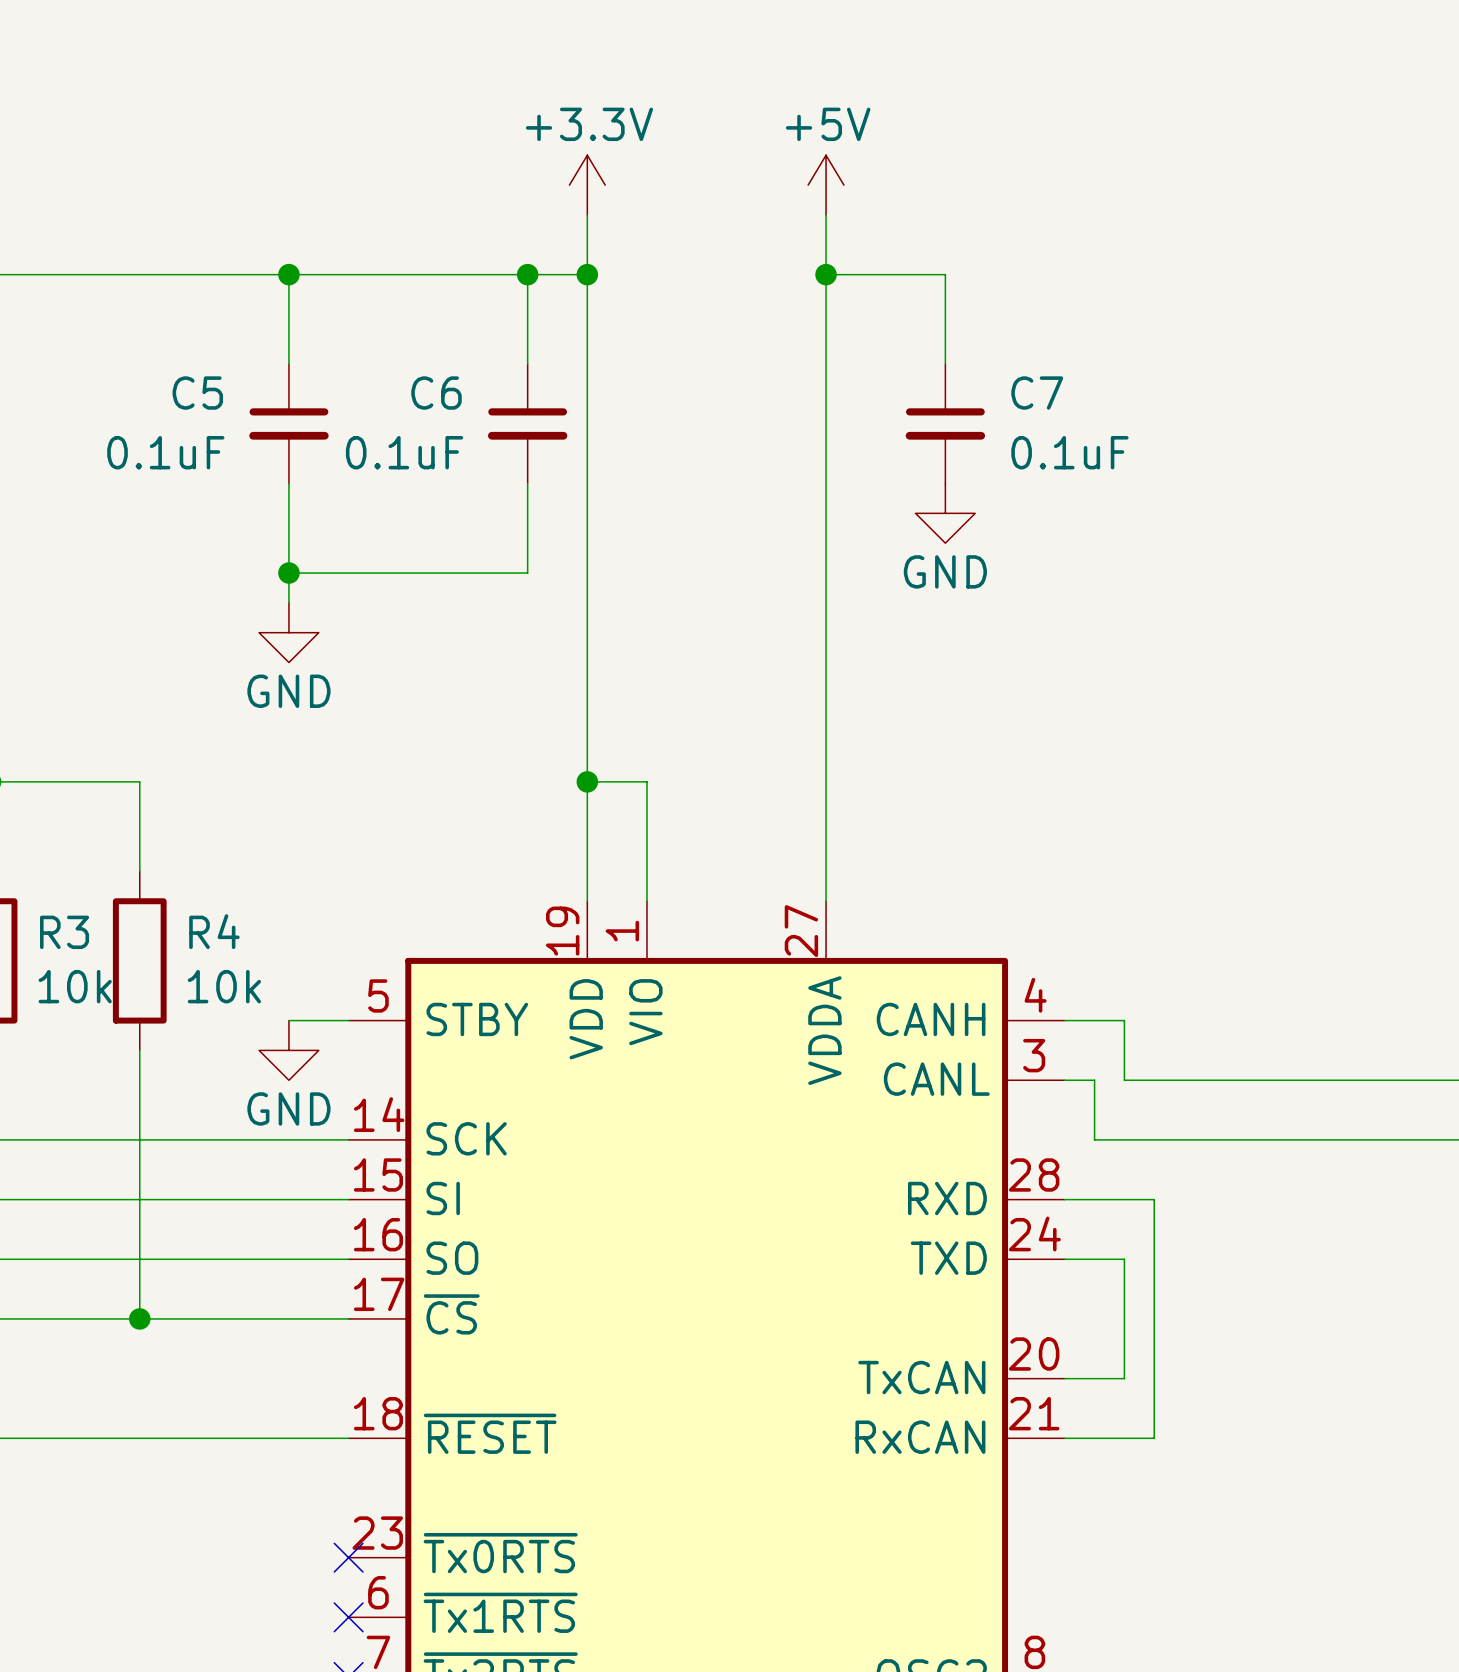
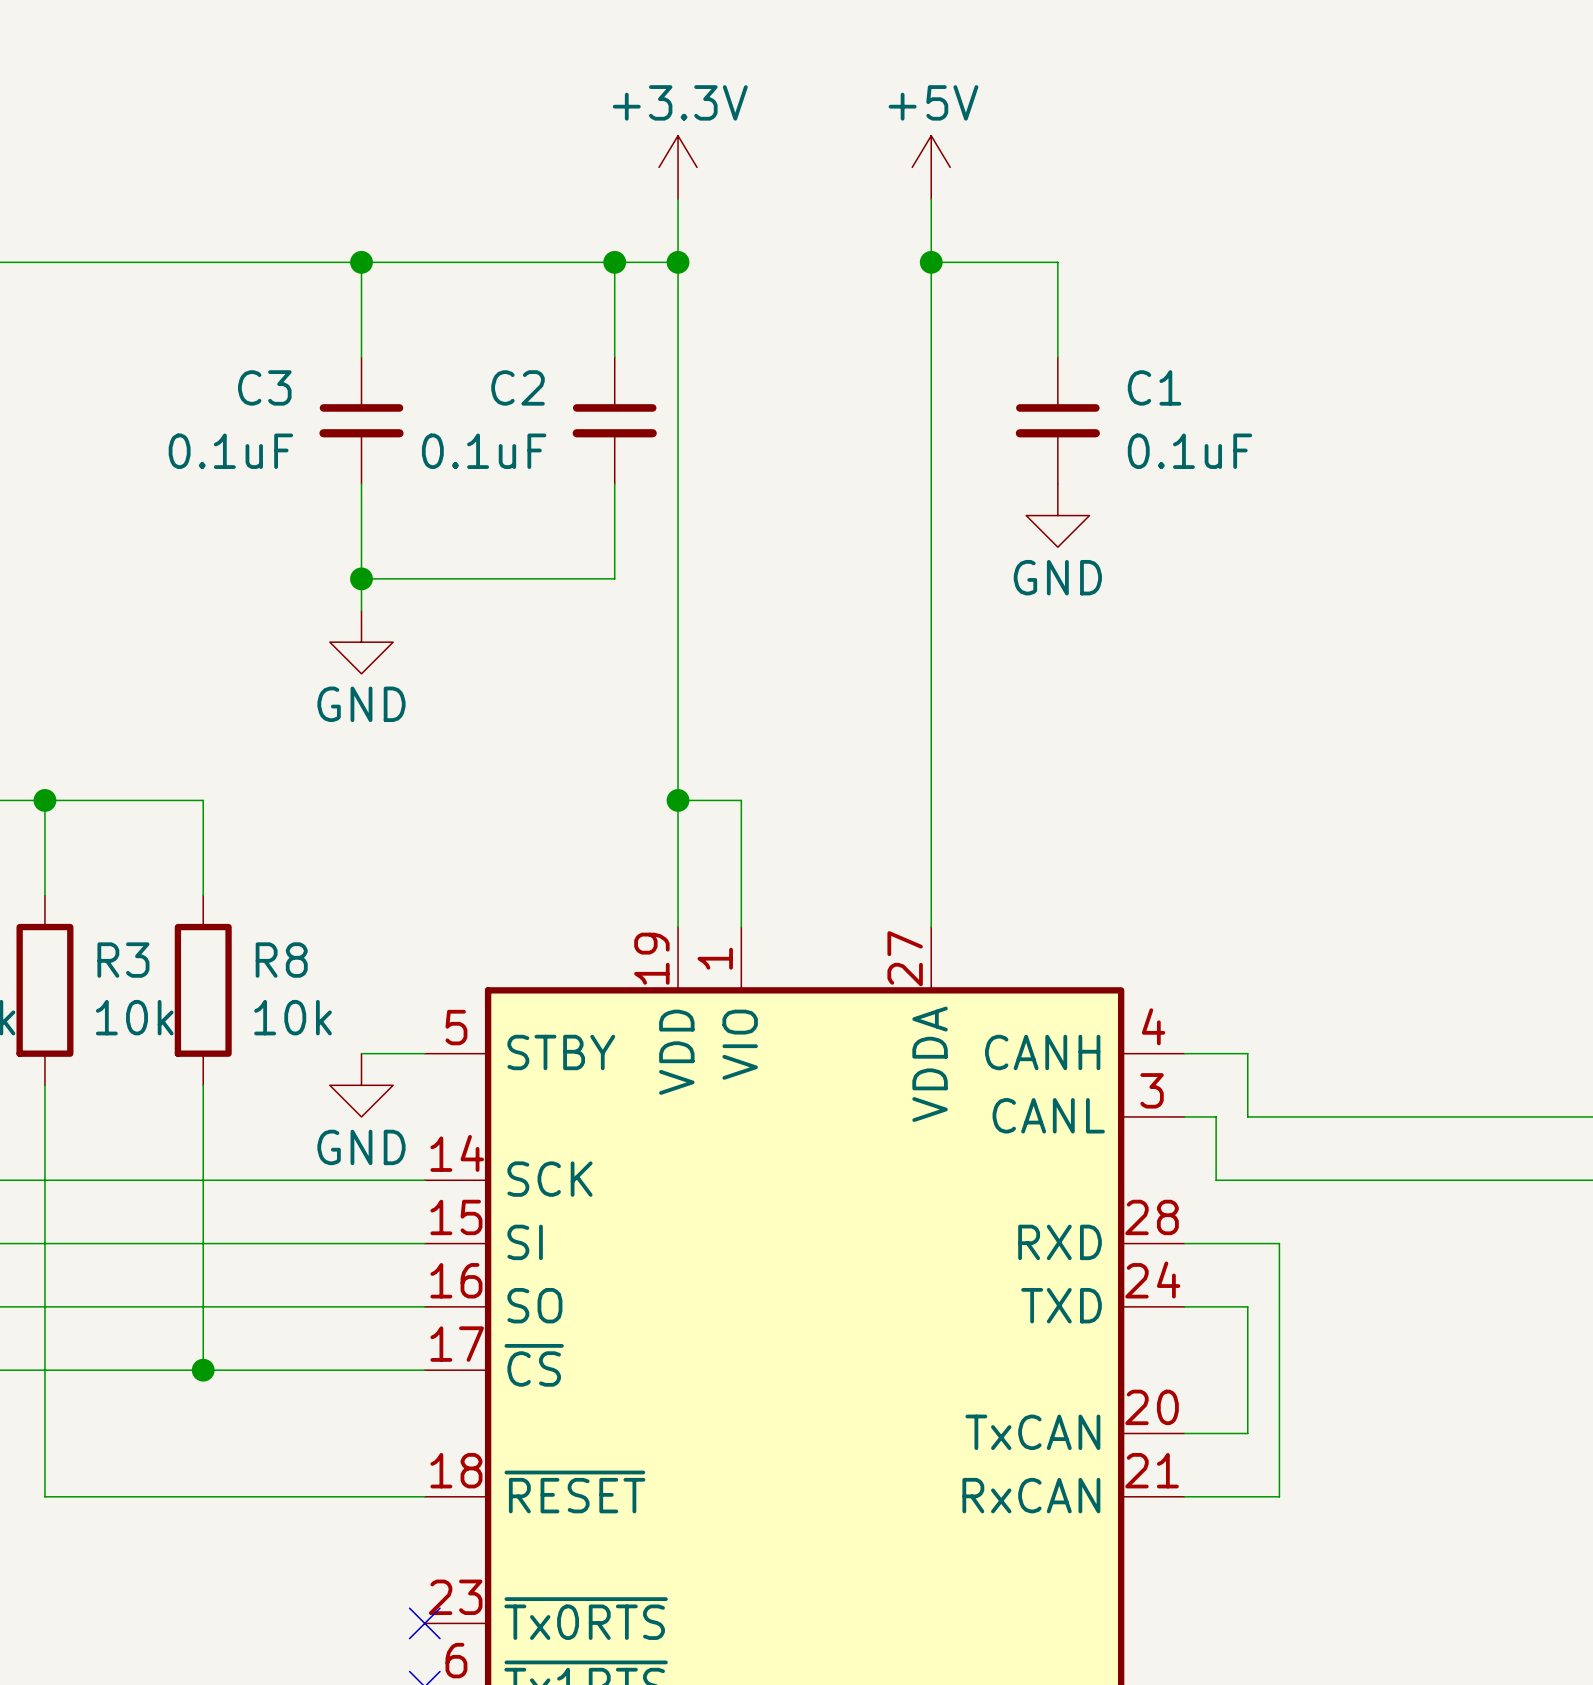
C5 name: C5 (197, 393) -> C3 (264, 387)
C6 name: C6 (436, 393) -> C2 (518, 387)
C7 name: C7 (1037, 393) -> C1 (1154, 387)
R4 name: R4 (214, 931) -> R8 (281, 960)

